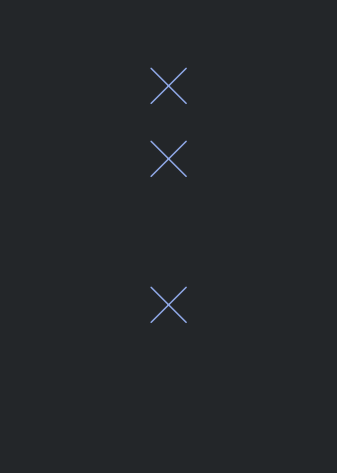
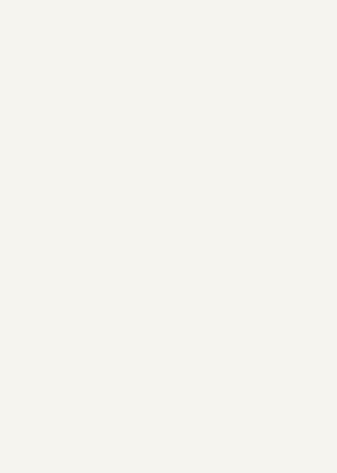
no-connect mark: (168, 85) -> none
no-connect mark: (168, 158) -> none
no-connect mark: (168, 304) -> none

